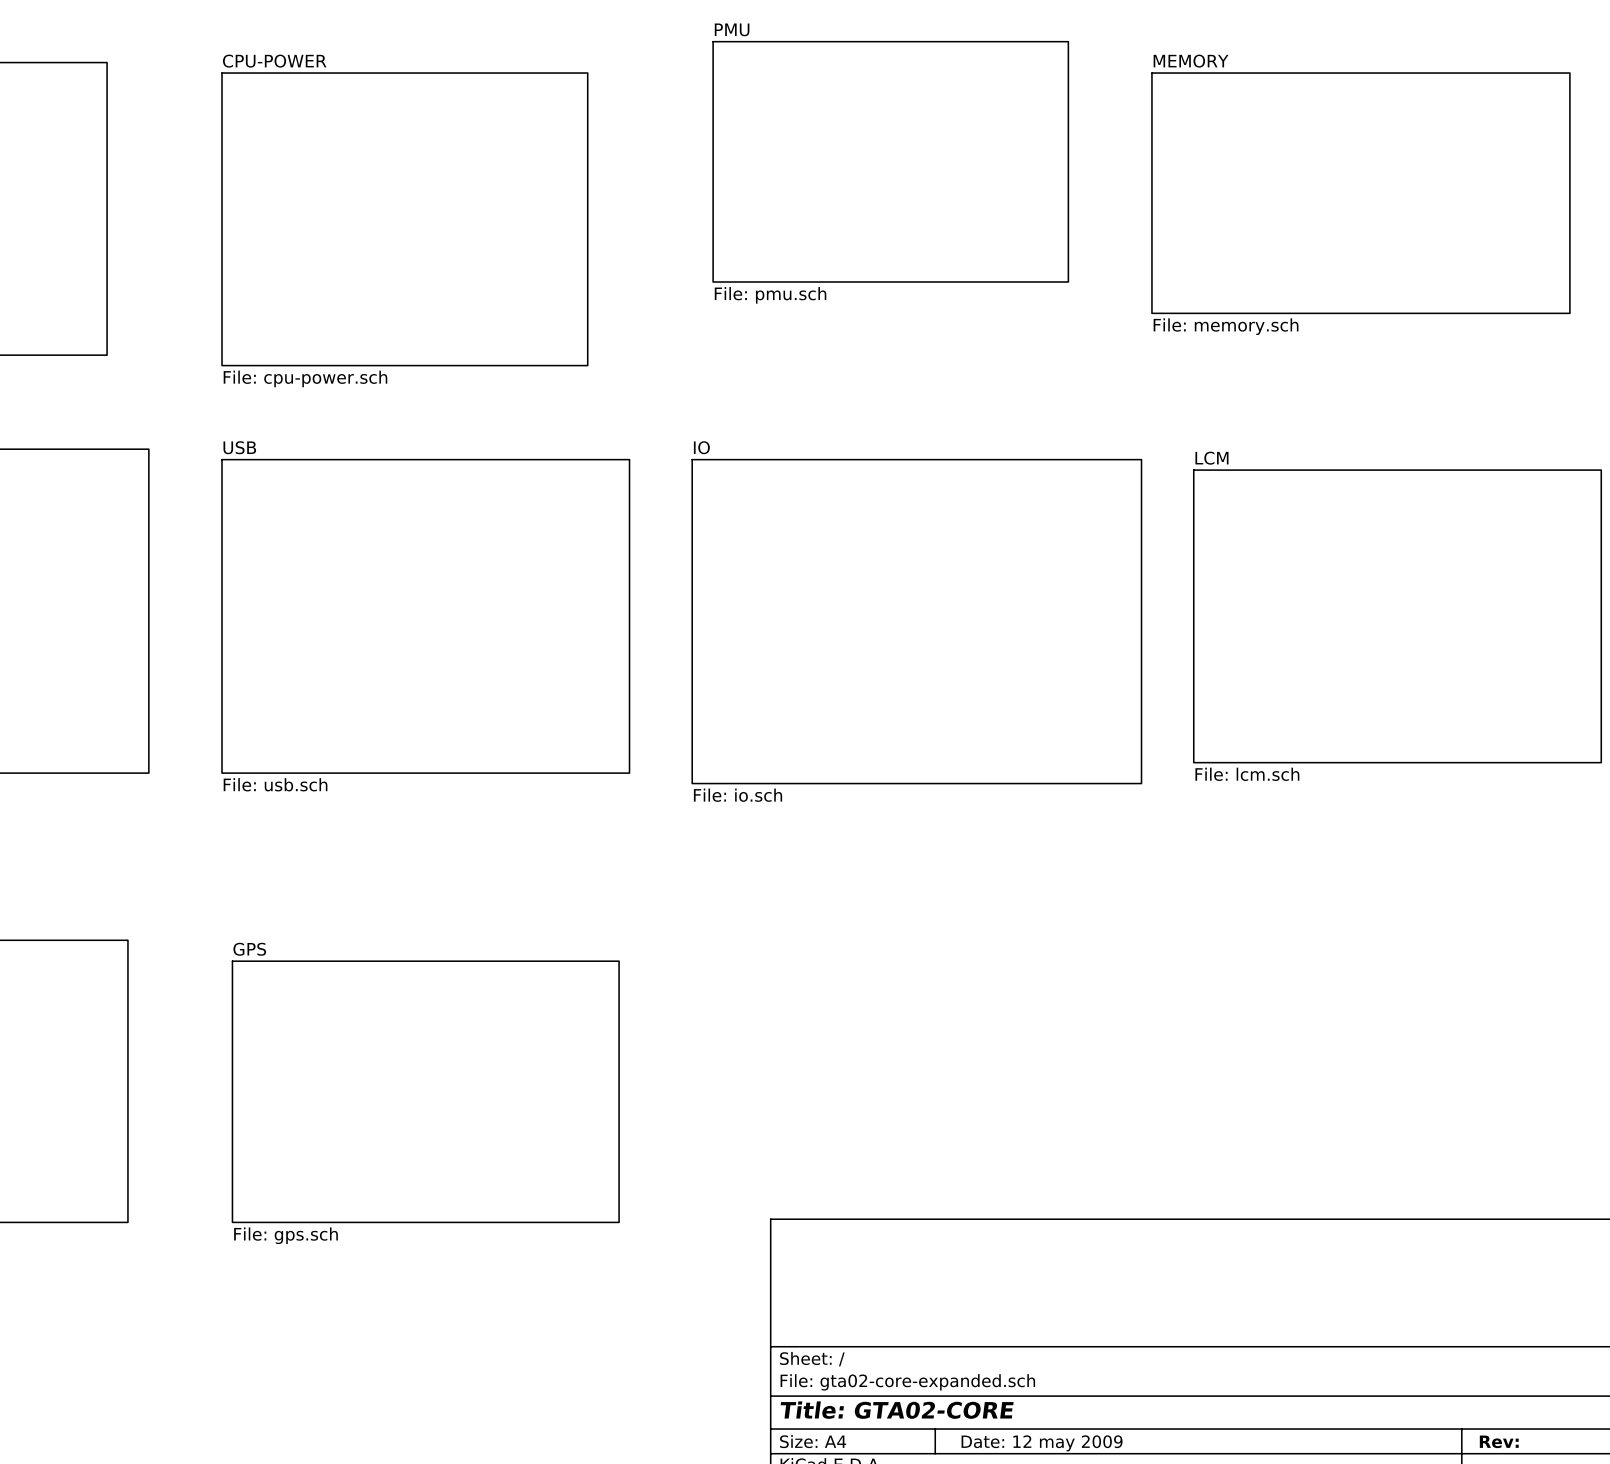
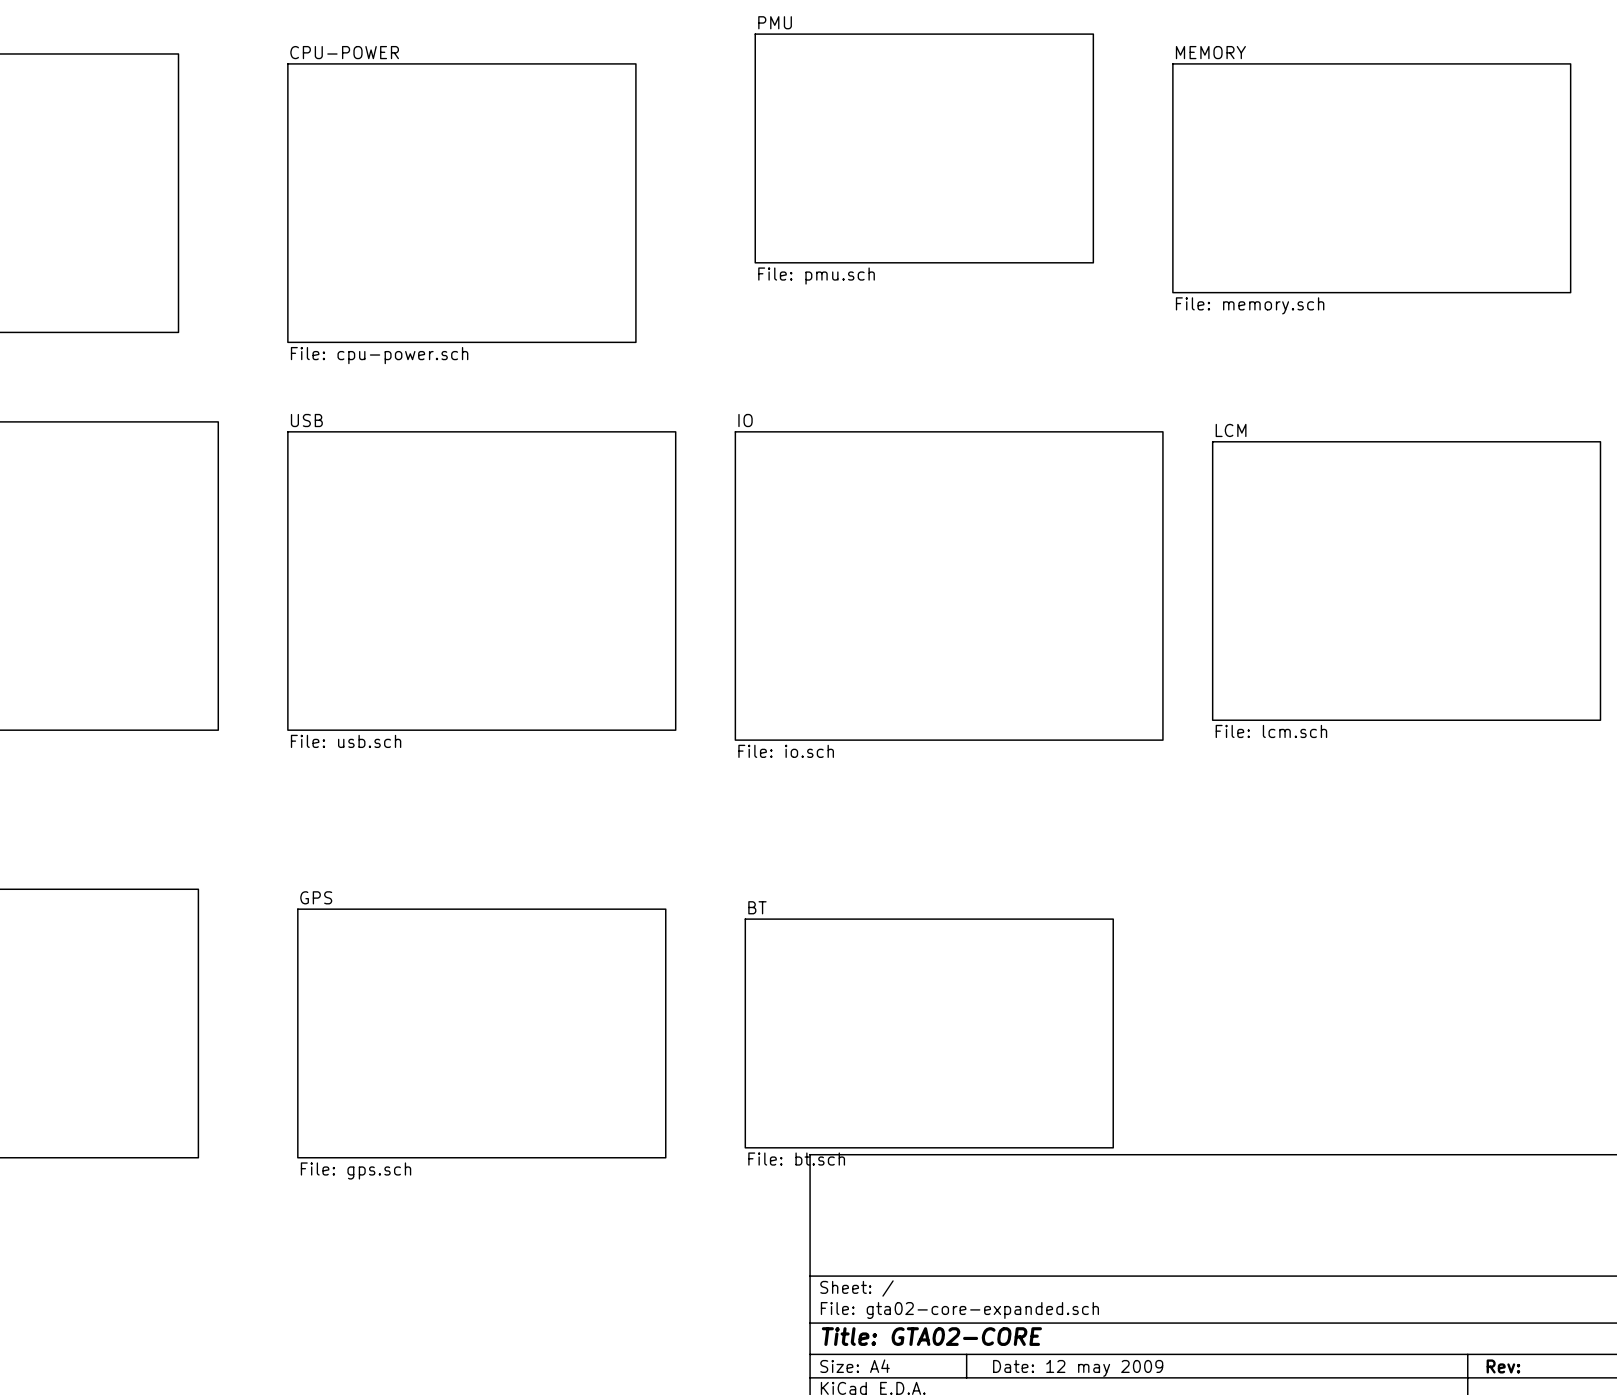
sheet BT: none -> File: bt.sch (929, 1033)

